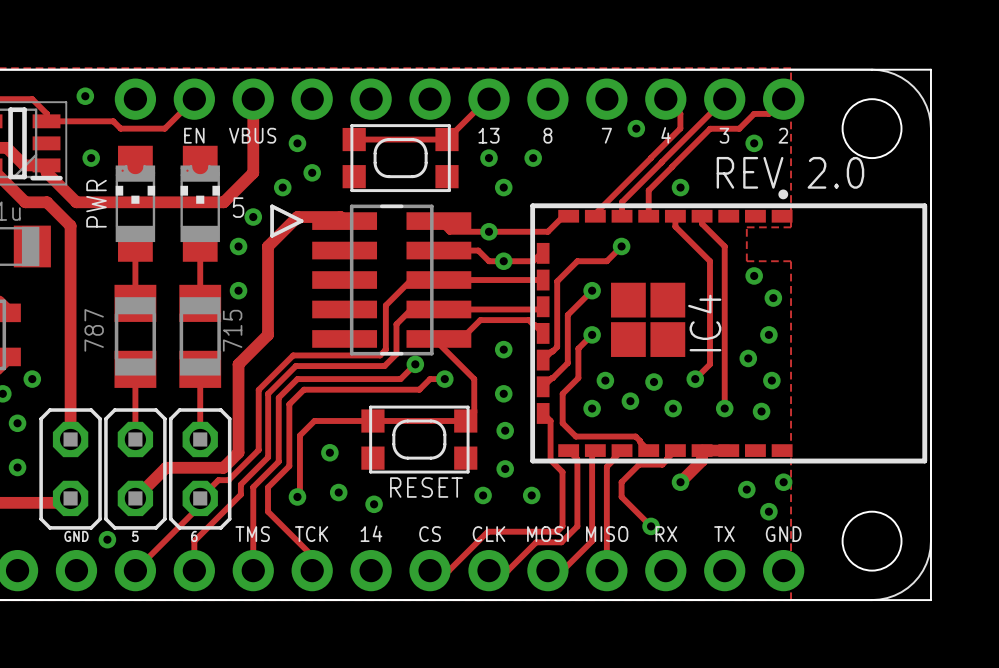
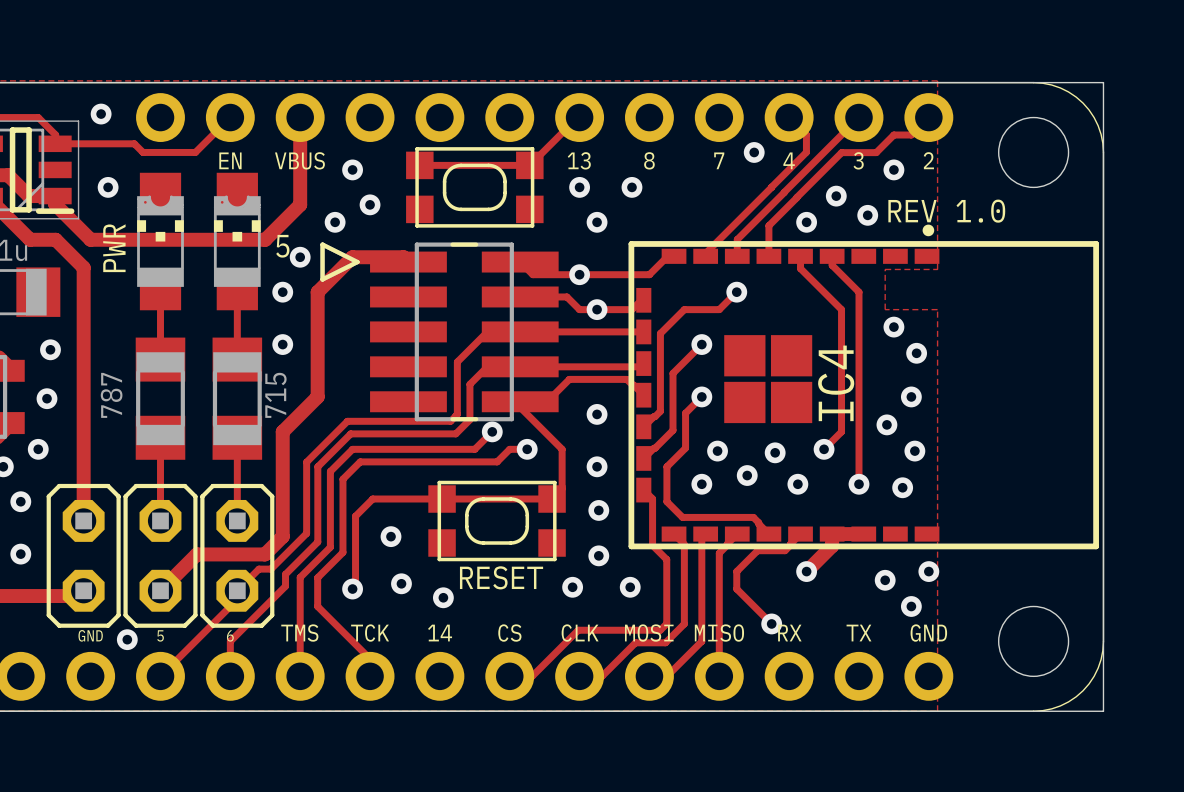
via: none -> (836, 196)
text: REV 2.0 (790, 172) -> REV 1.0 (946, 211)
via: none -> (867, 215)
via: none -> (50, 349)
via: none -> (46, 398)

